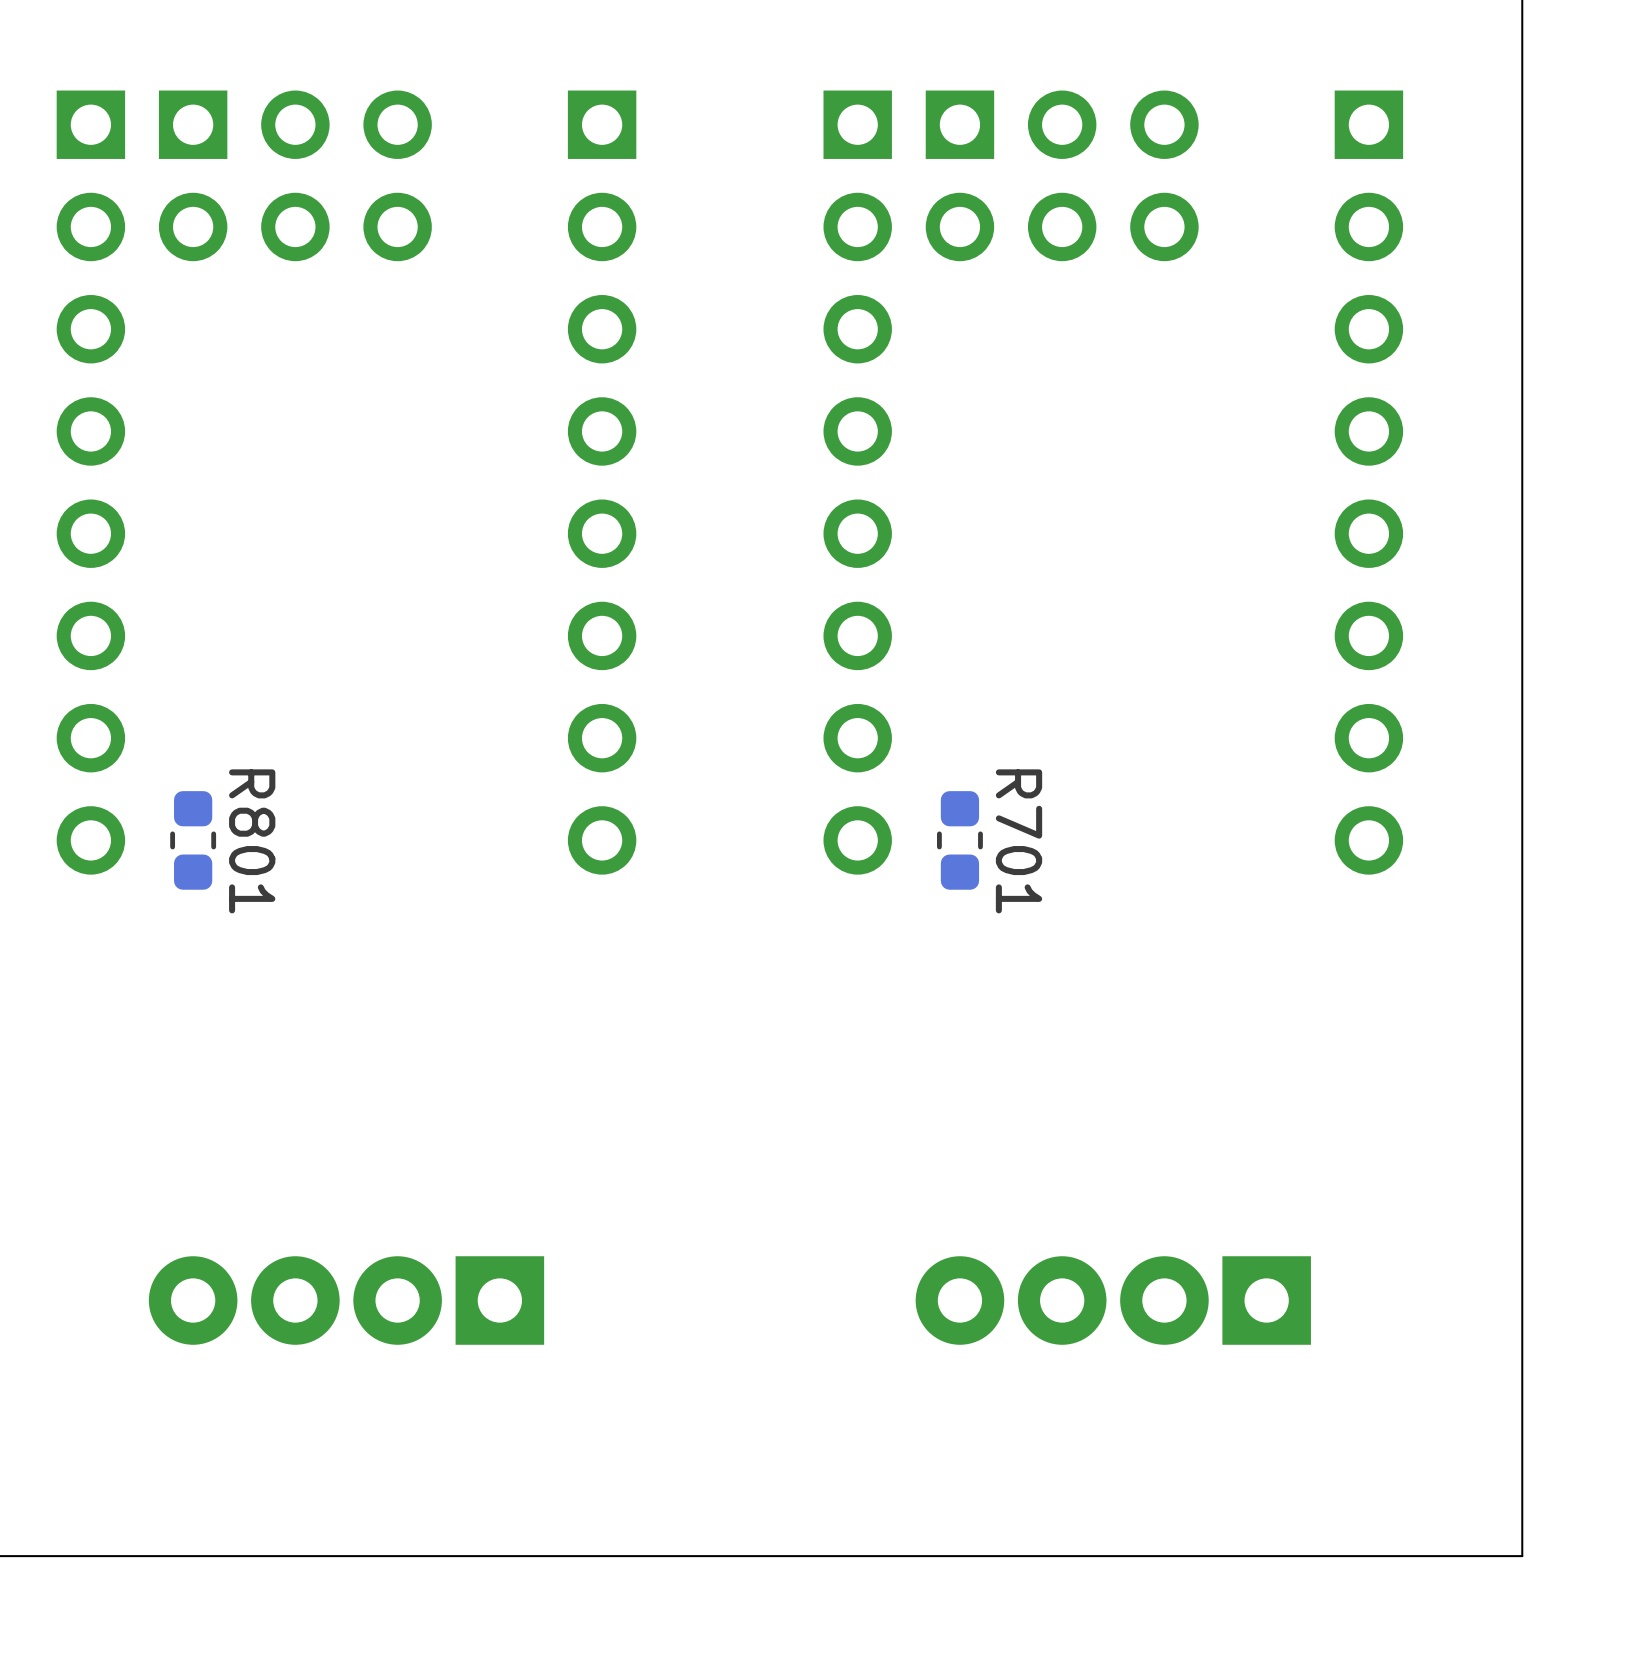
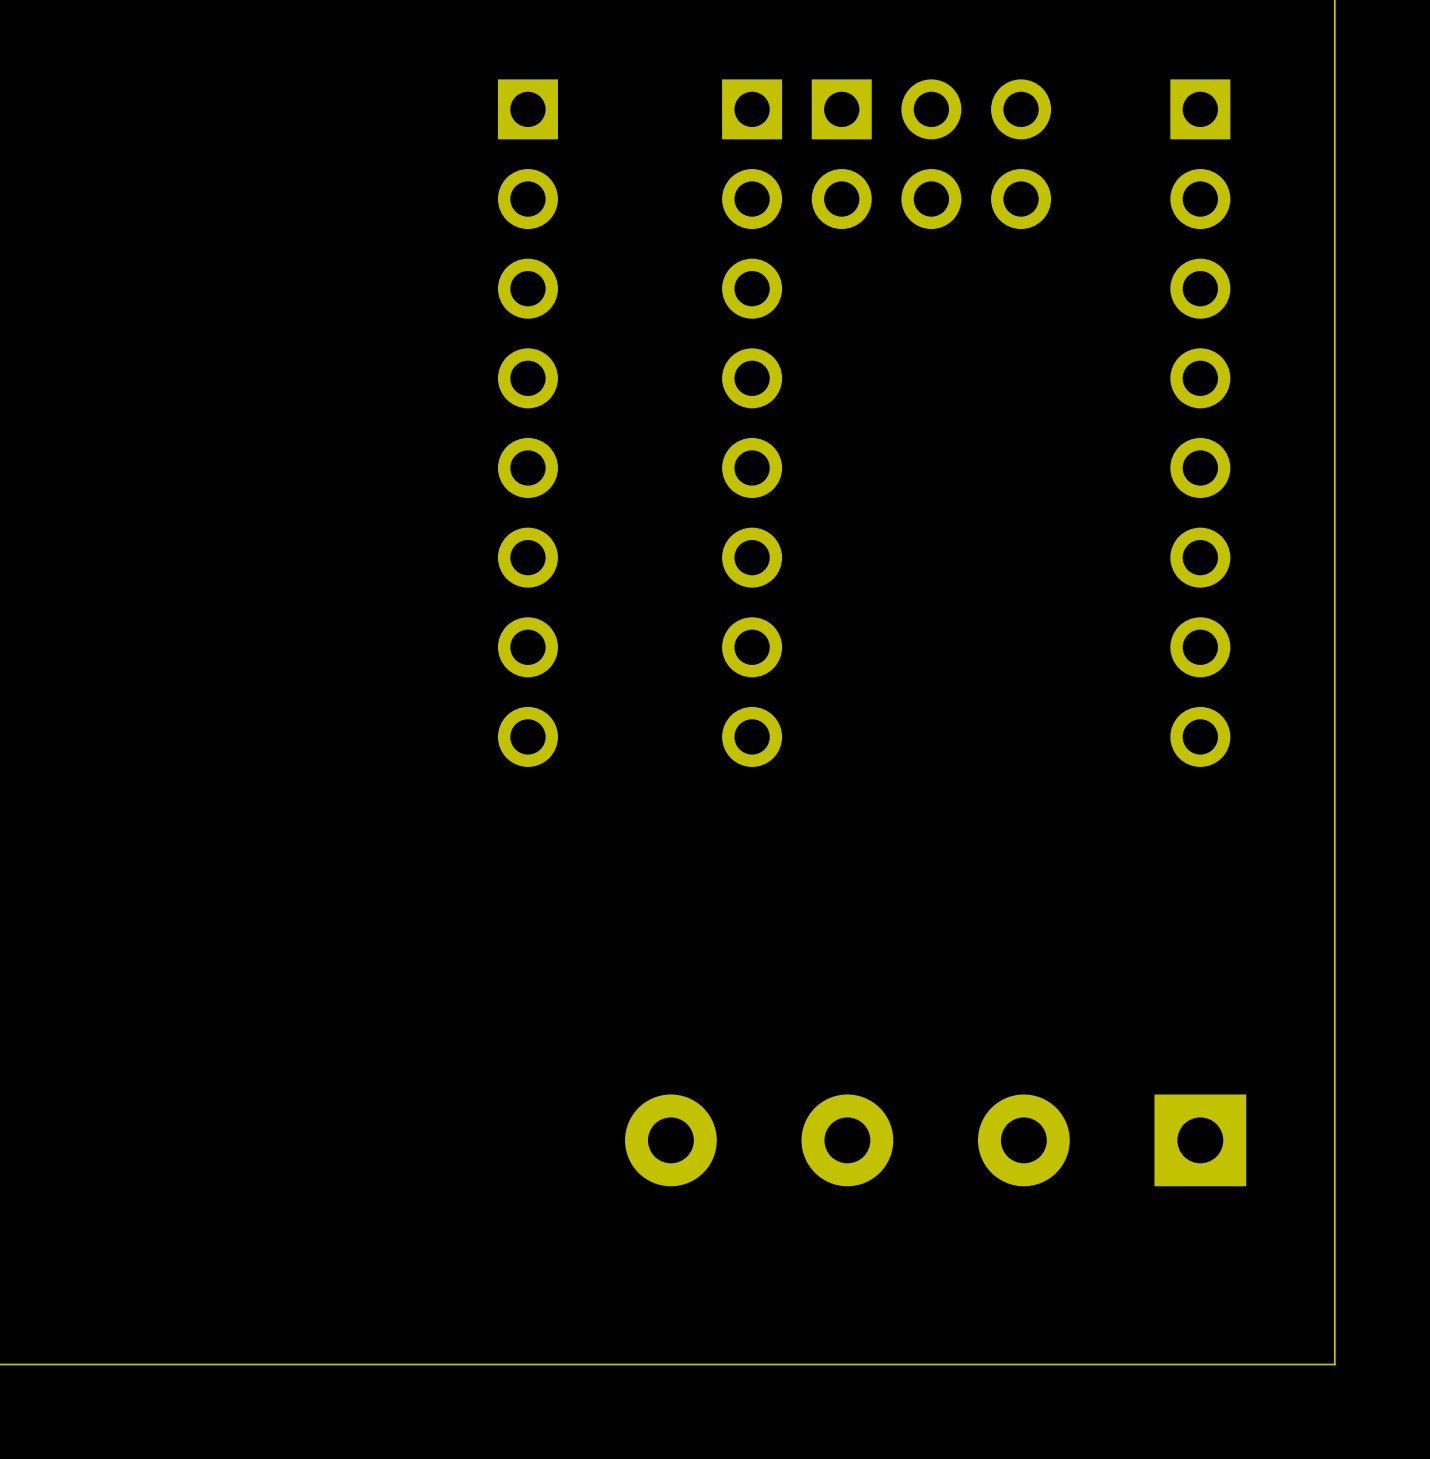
part: (295, 175) -> none
part: (90, 482) -> none
R801: (193, 840) -> none
R701: (959, 840) -> none
part: (346, 1300) -> none
part: none -> (935, 1140)
part: (1113, 1300) -> none

